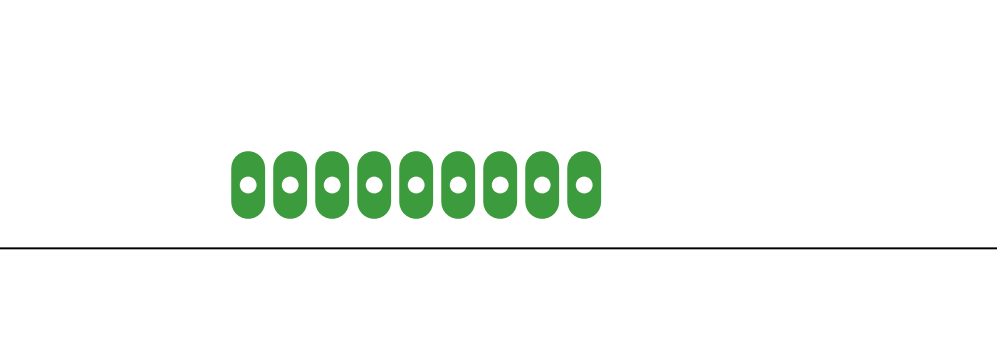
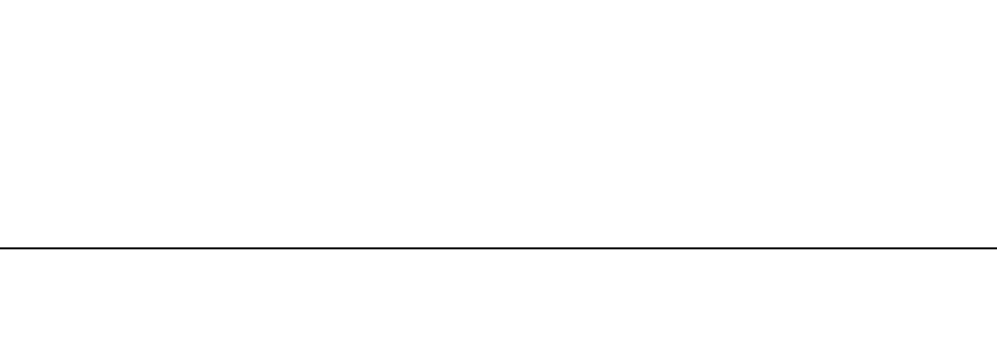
part: (416, 185) -> none

